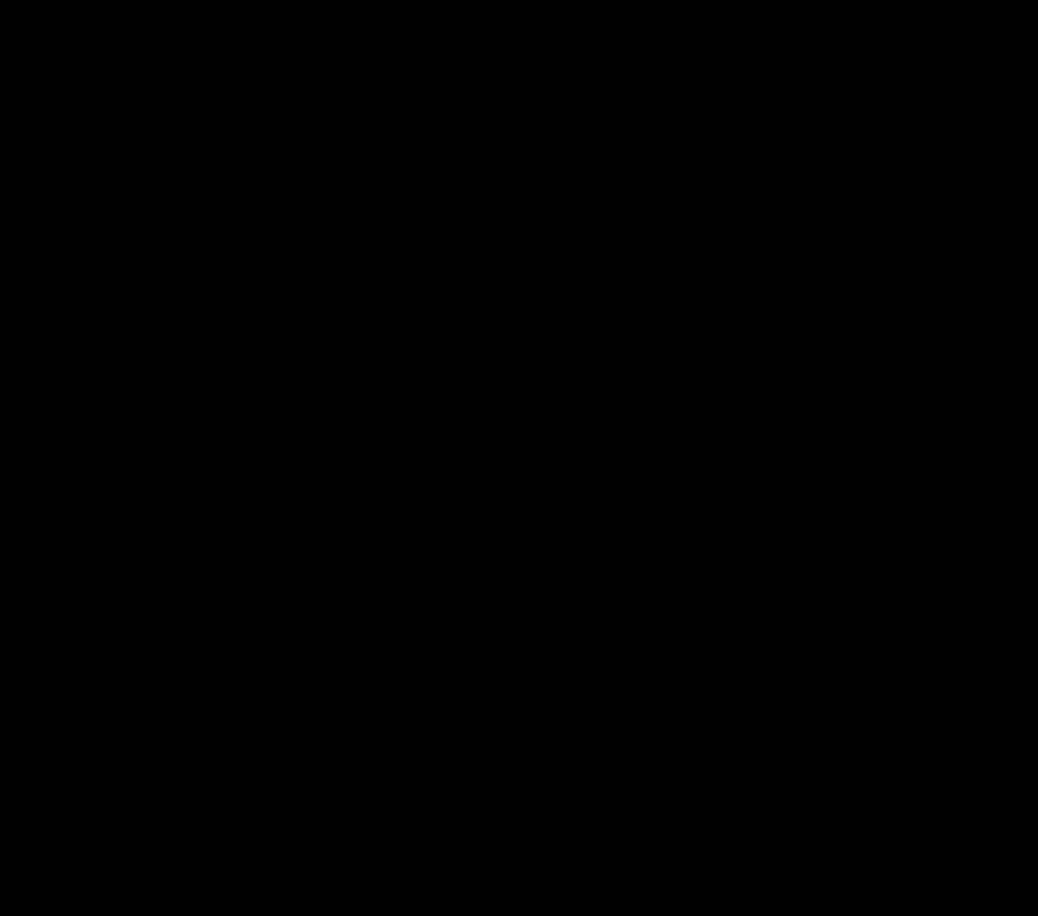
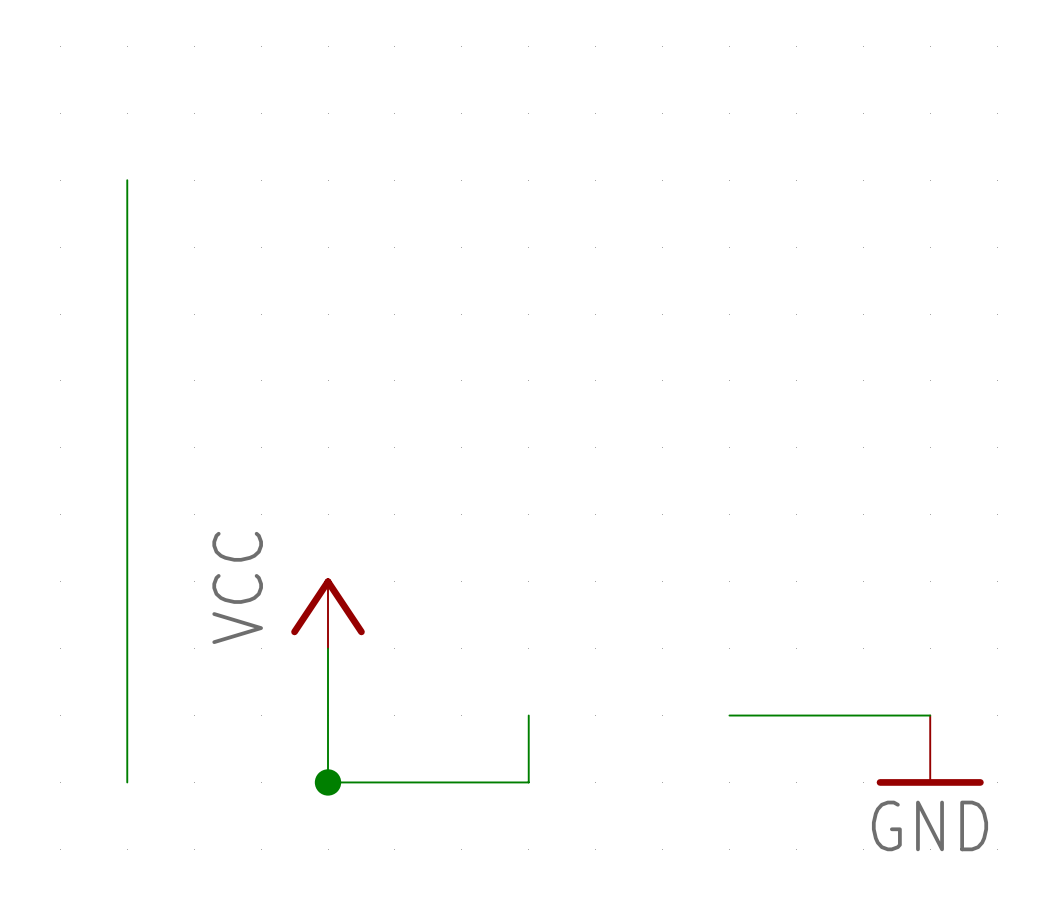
wire: none -> (127, 180) (127, 782)
power symbol: none -> VCC (328, 613)
wire: none -> (328, 648) (328, 782) (528, 782) (528, 715)
wire: none -> (729, 715) (930, 715)
power symbol: none -> GND (930, 750)
junction: none -> (328, 782)

